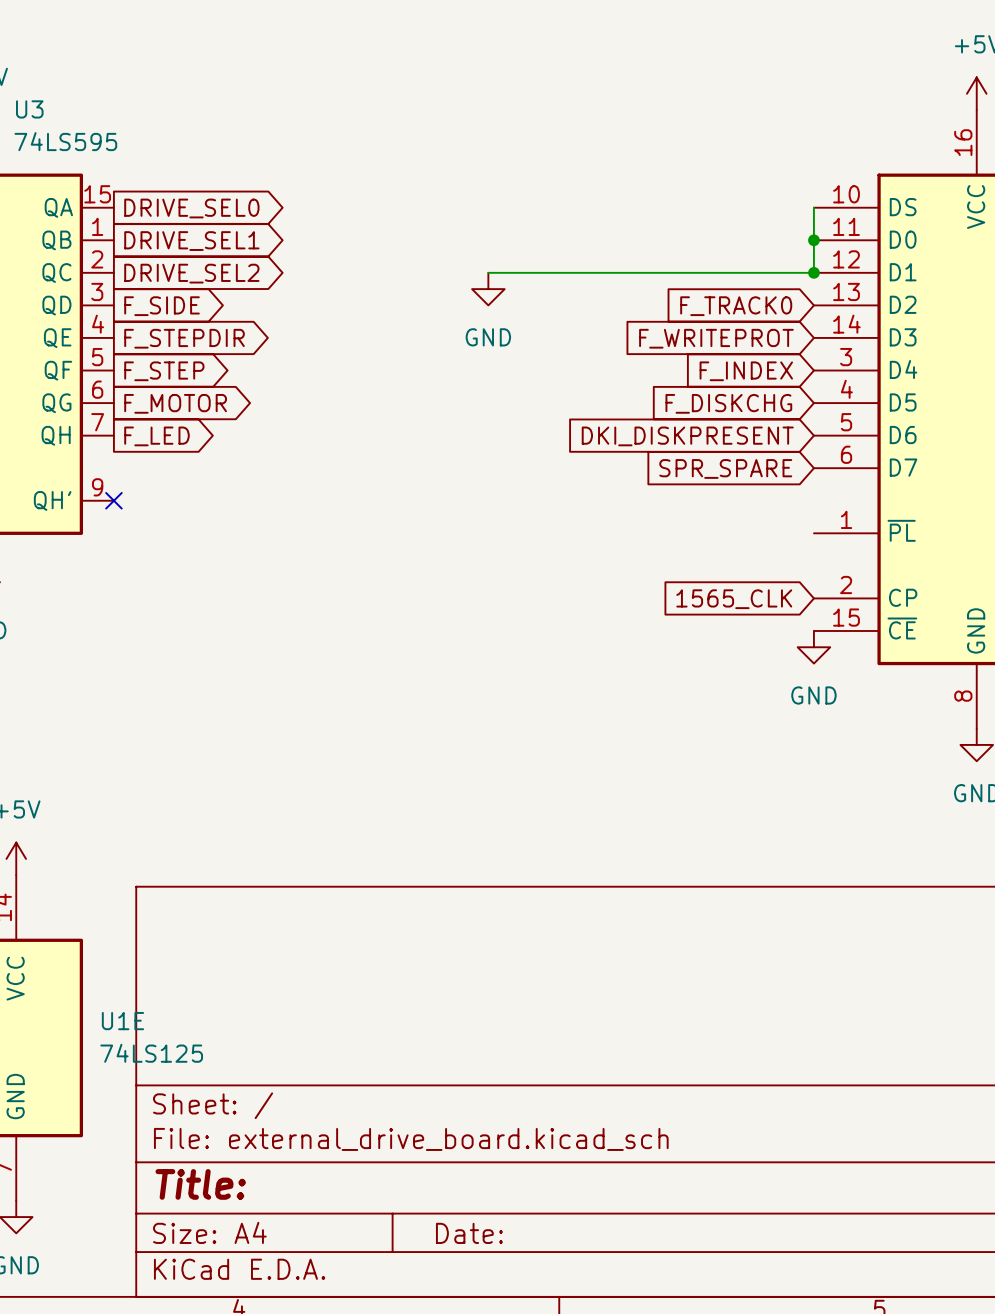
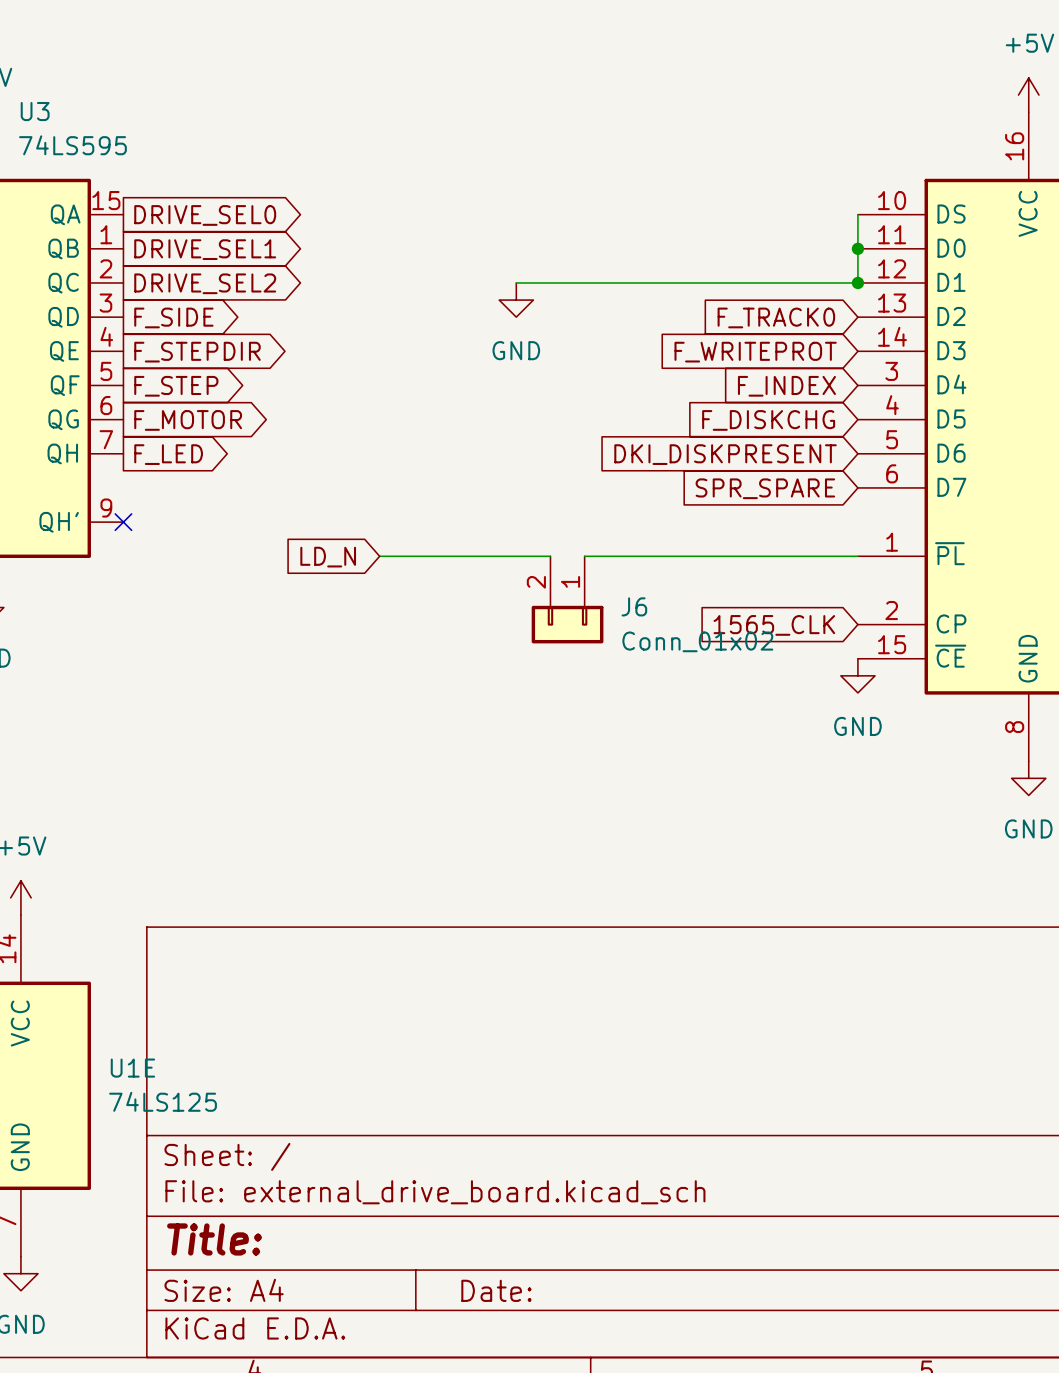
wire: none -> (379, 556) (550, 556)
wire: none -> (584, 556) (857, 556)
global label: none -> LD_N (328, 557)
J6: none -> Conn_01x02 (567, 599)

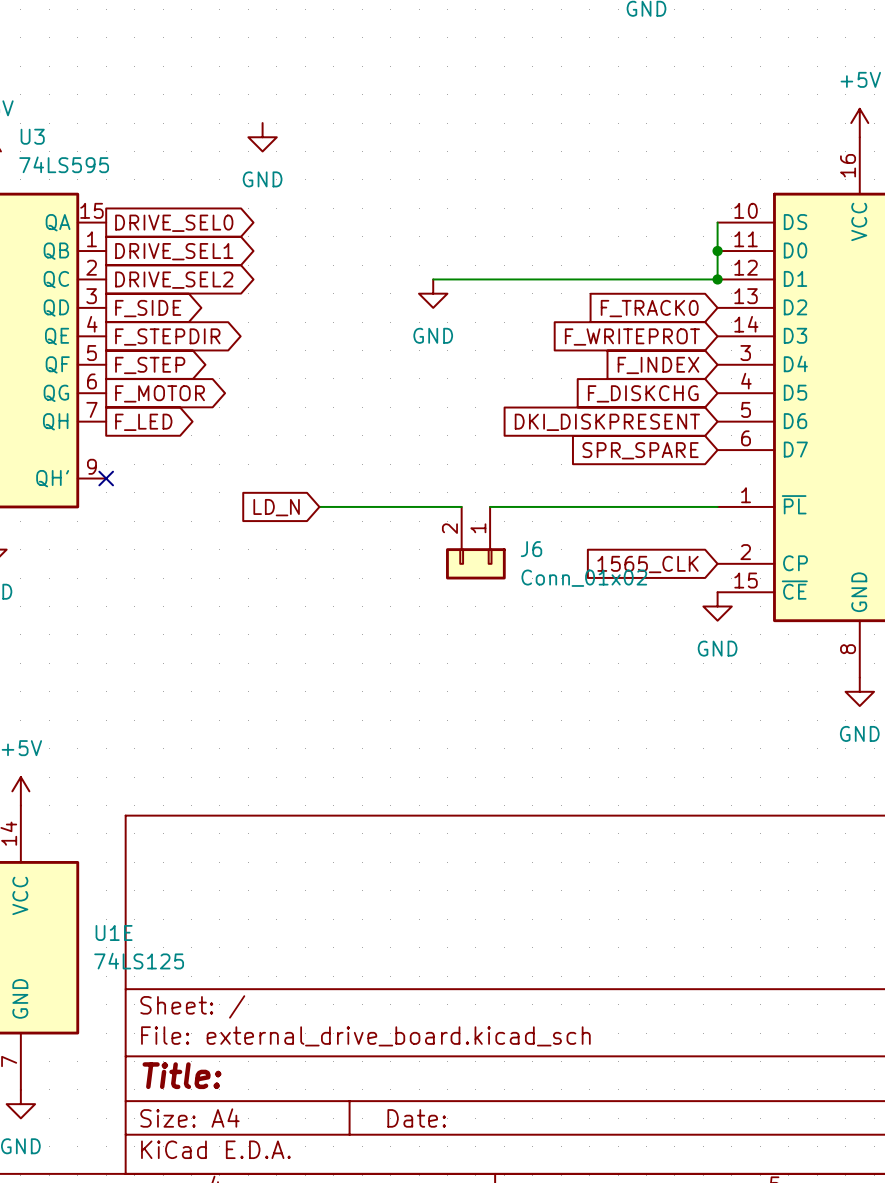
power symbol: none -> GND (262, 137)

